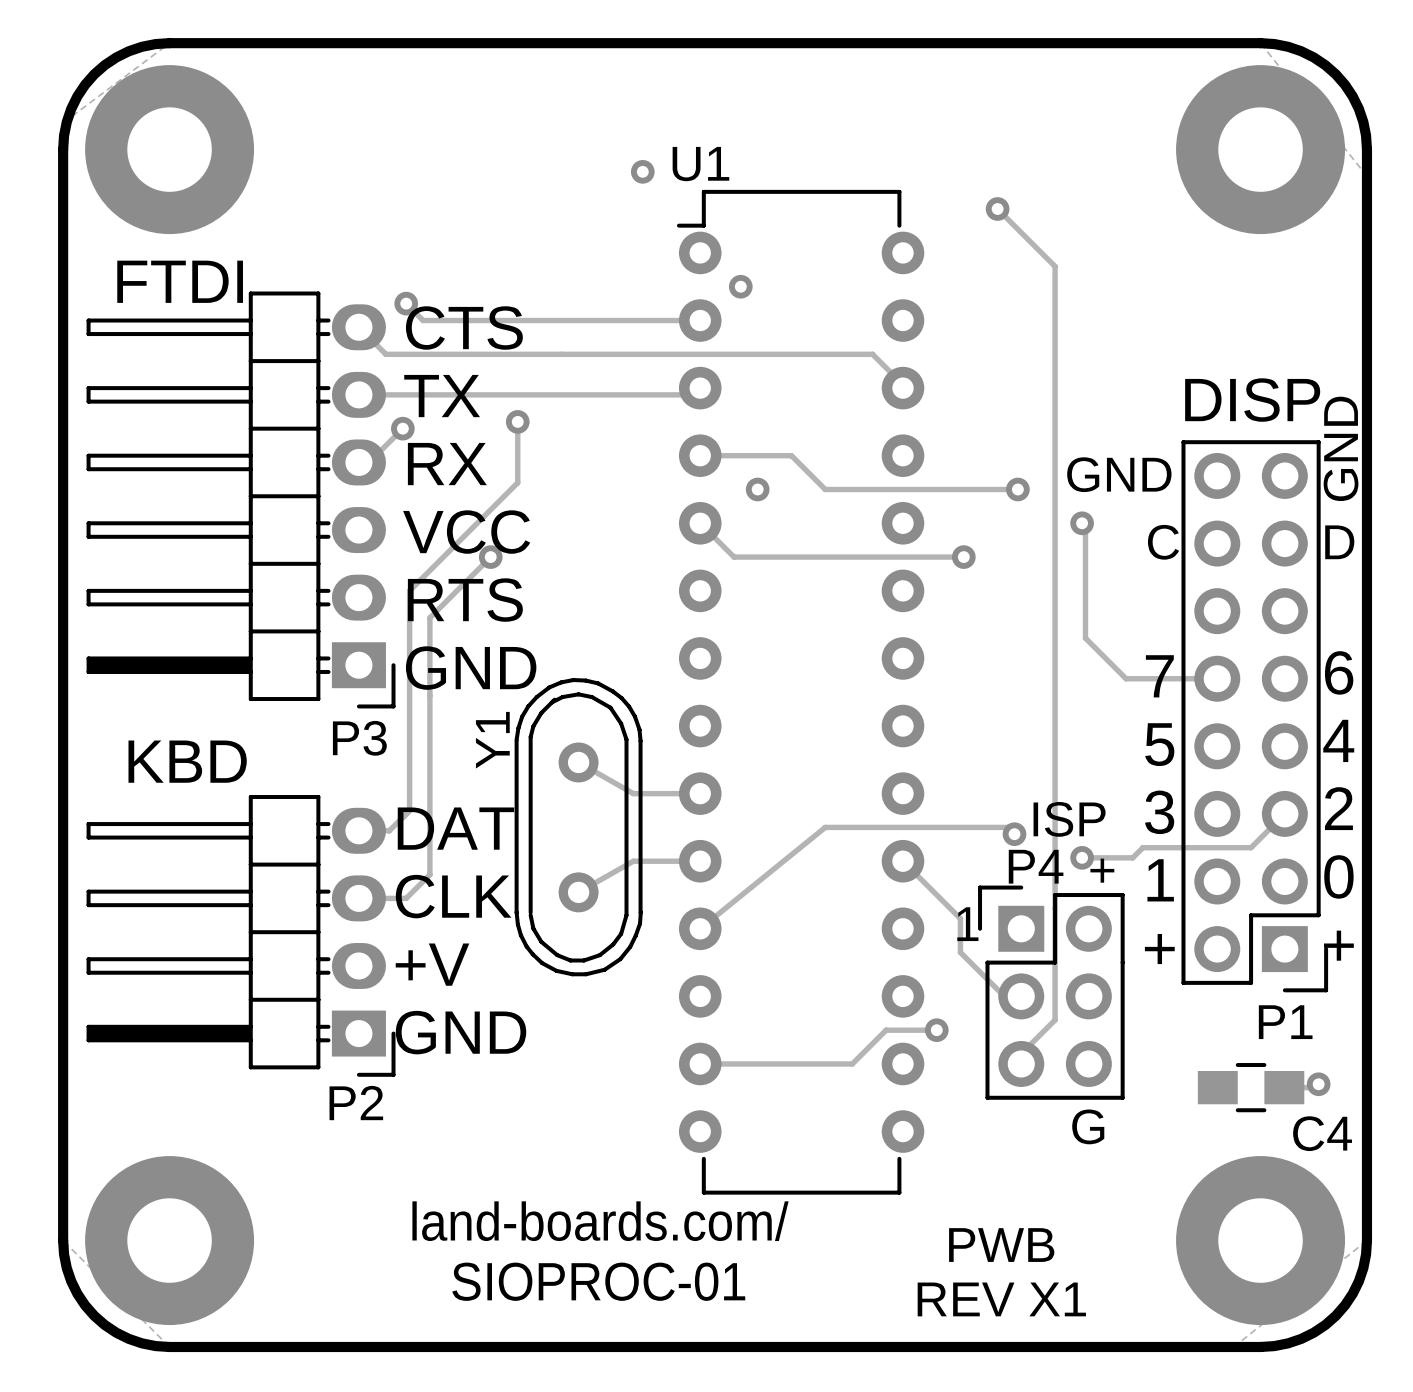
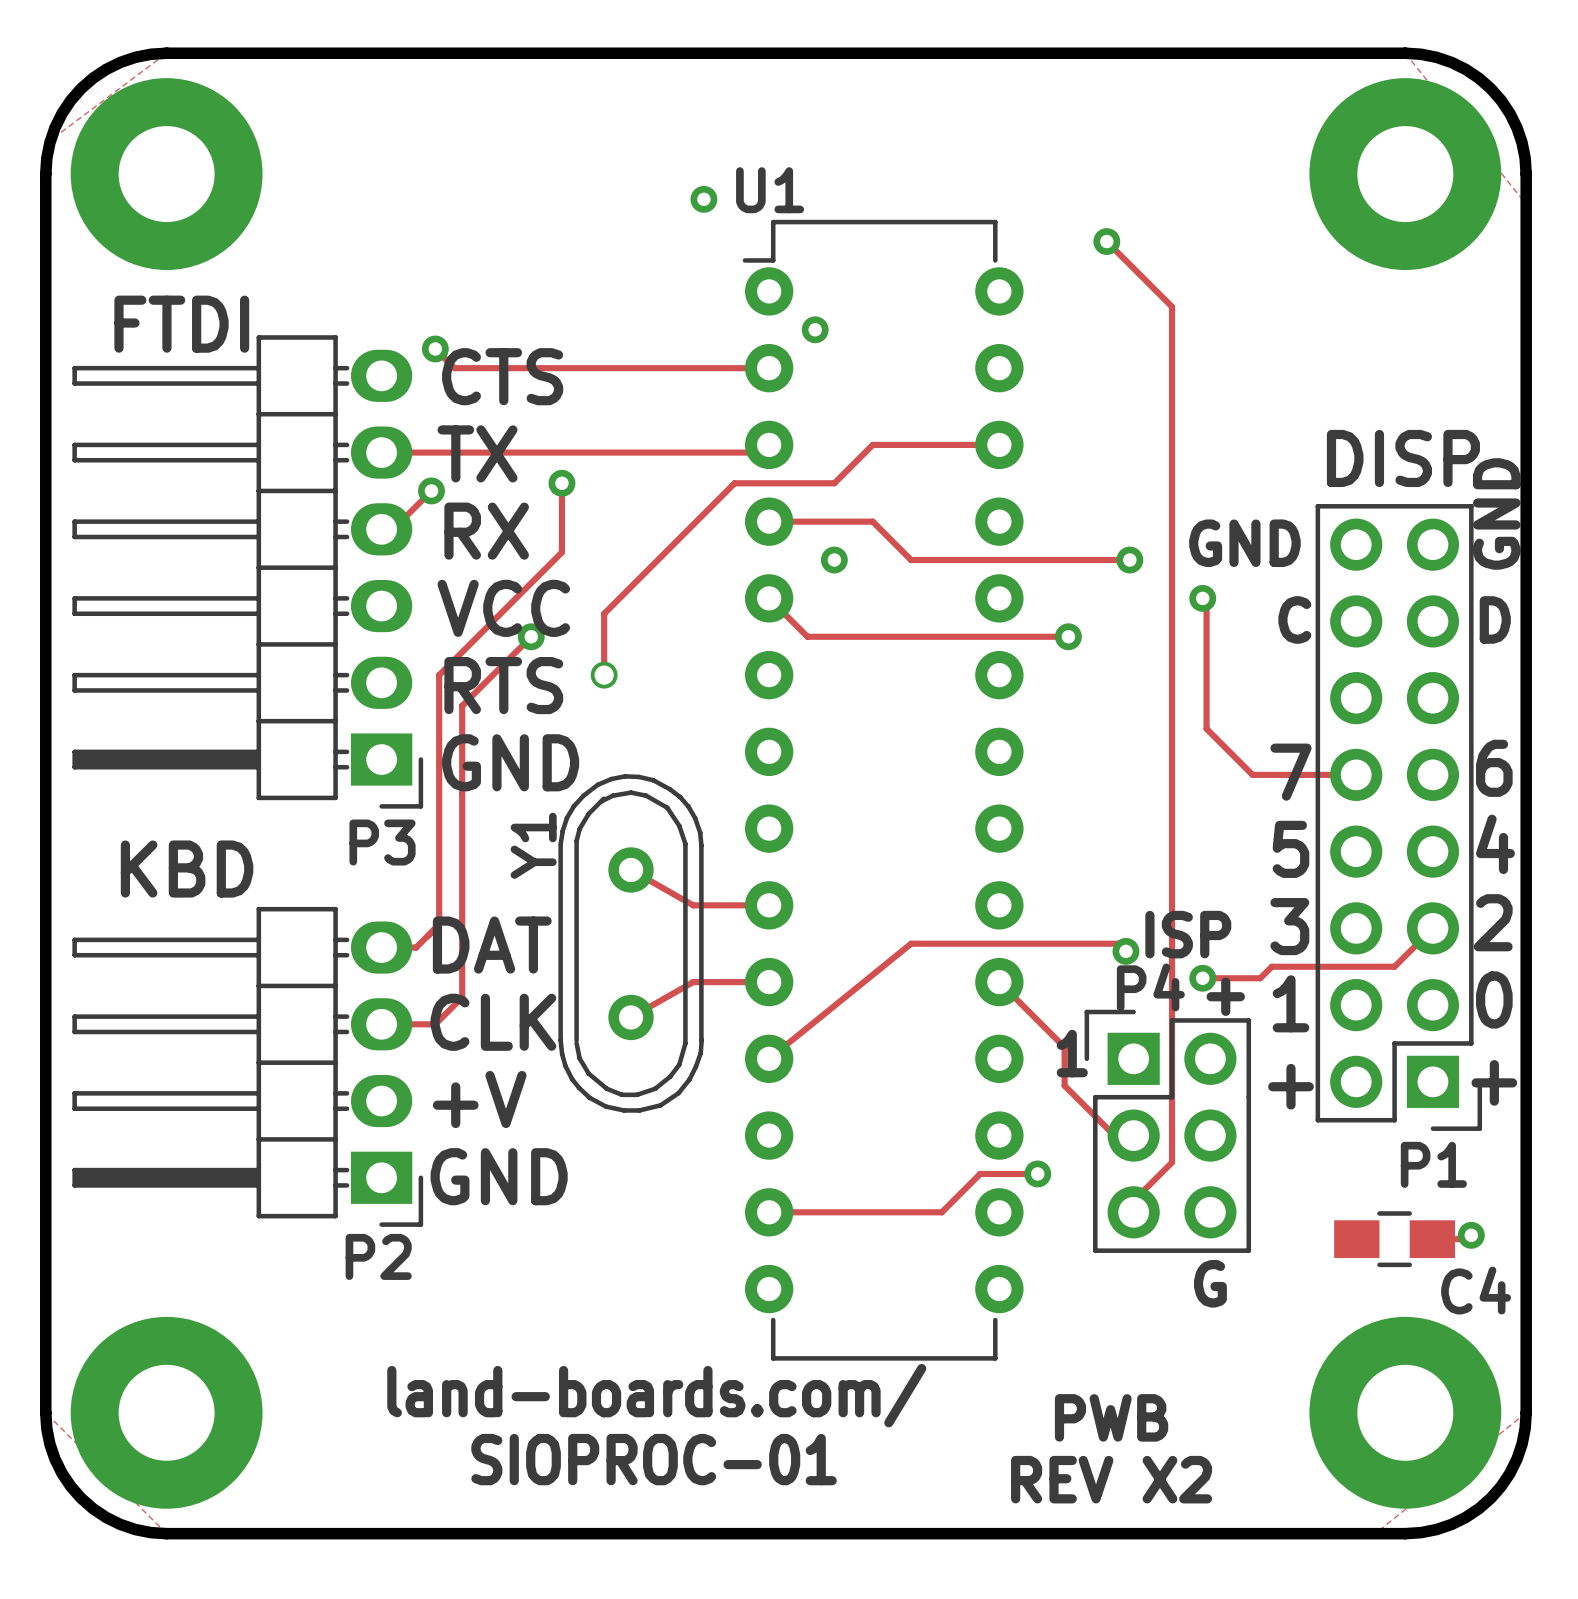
track: (358, 327) (385, 354) (872, 354) (903, 384) -> none
track: none -> (999, 444) (872, 444) (834, 483) (734, 483) (604, 613) (604, 675)
via: none -> (604, 675)
text: REV X1 (1001, 1299) -> REV X2 (1111, 1479)

